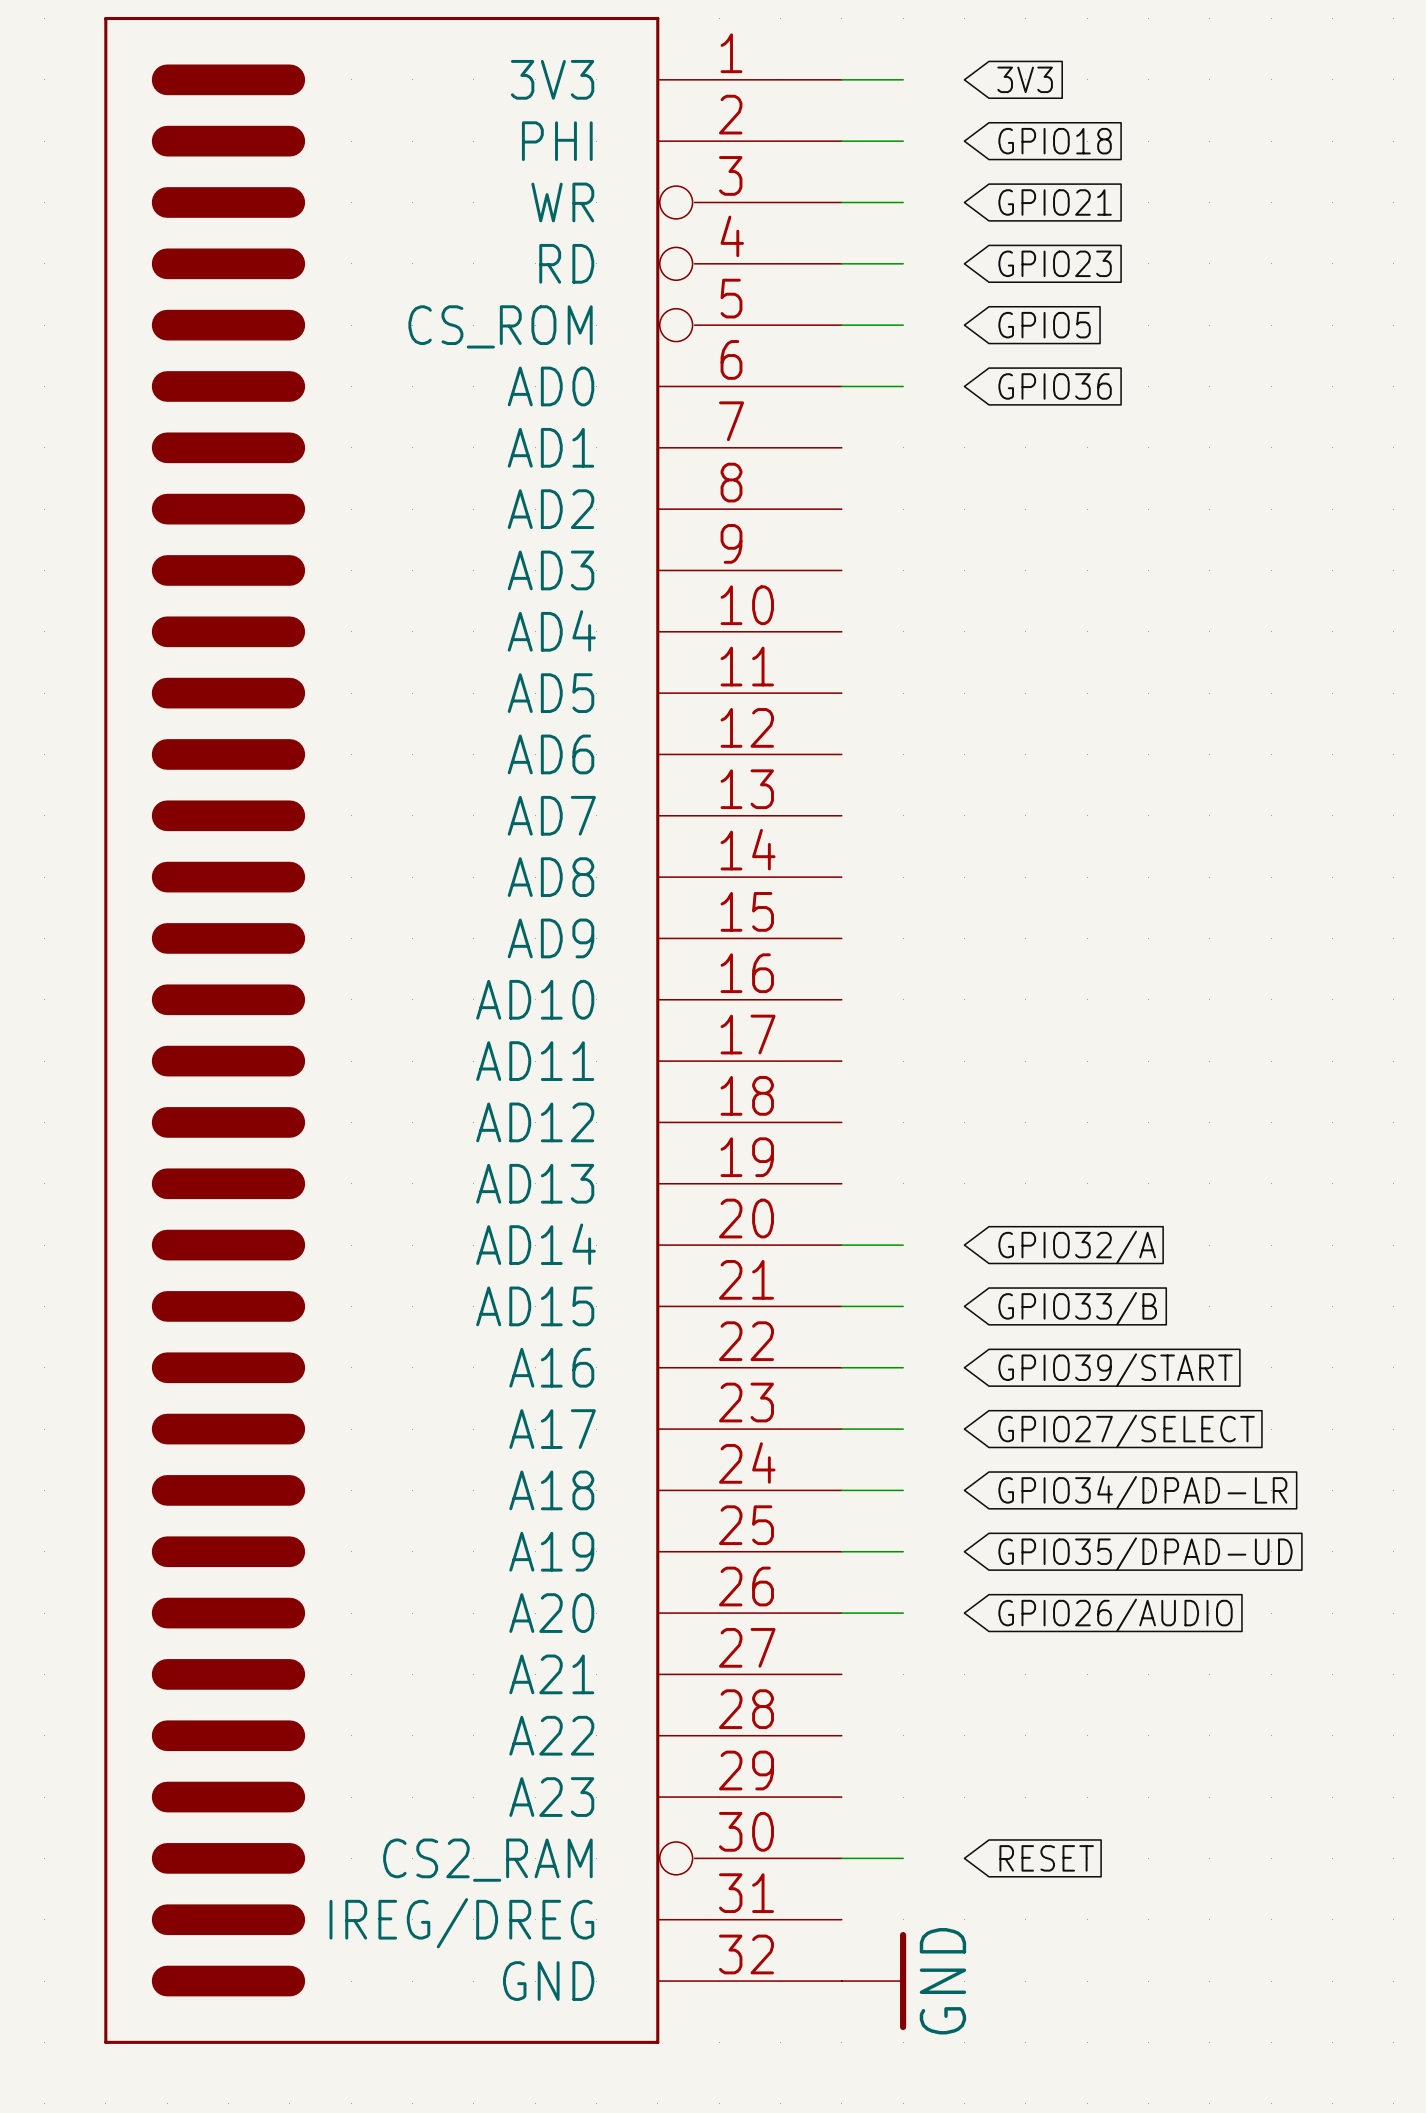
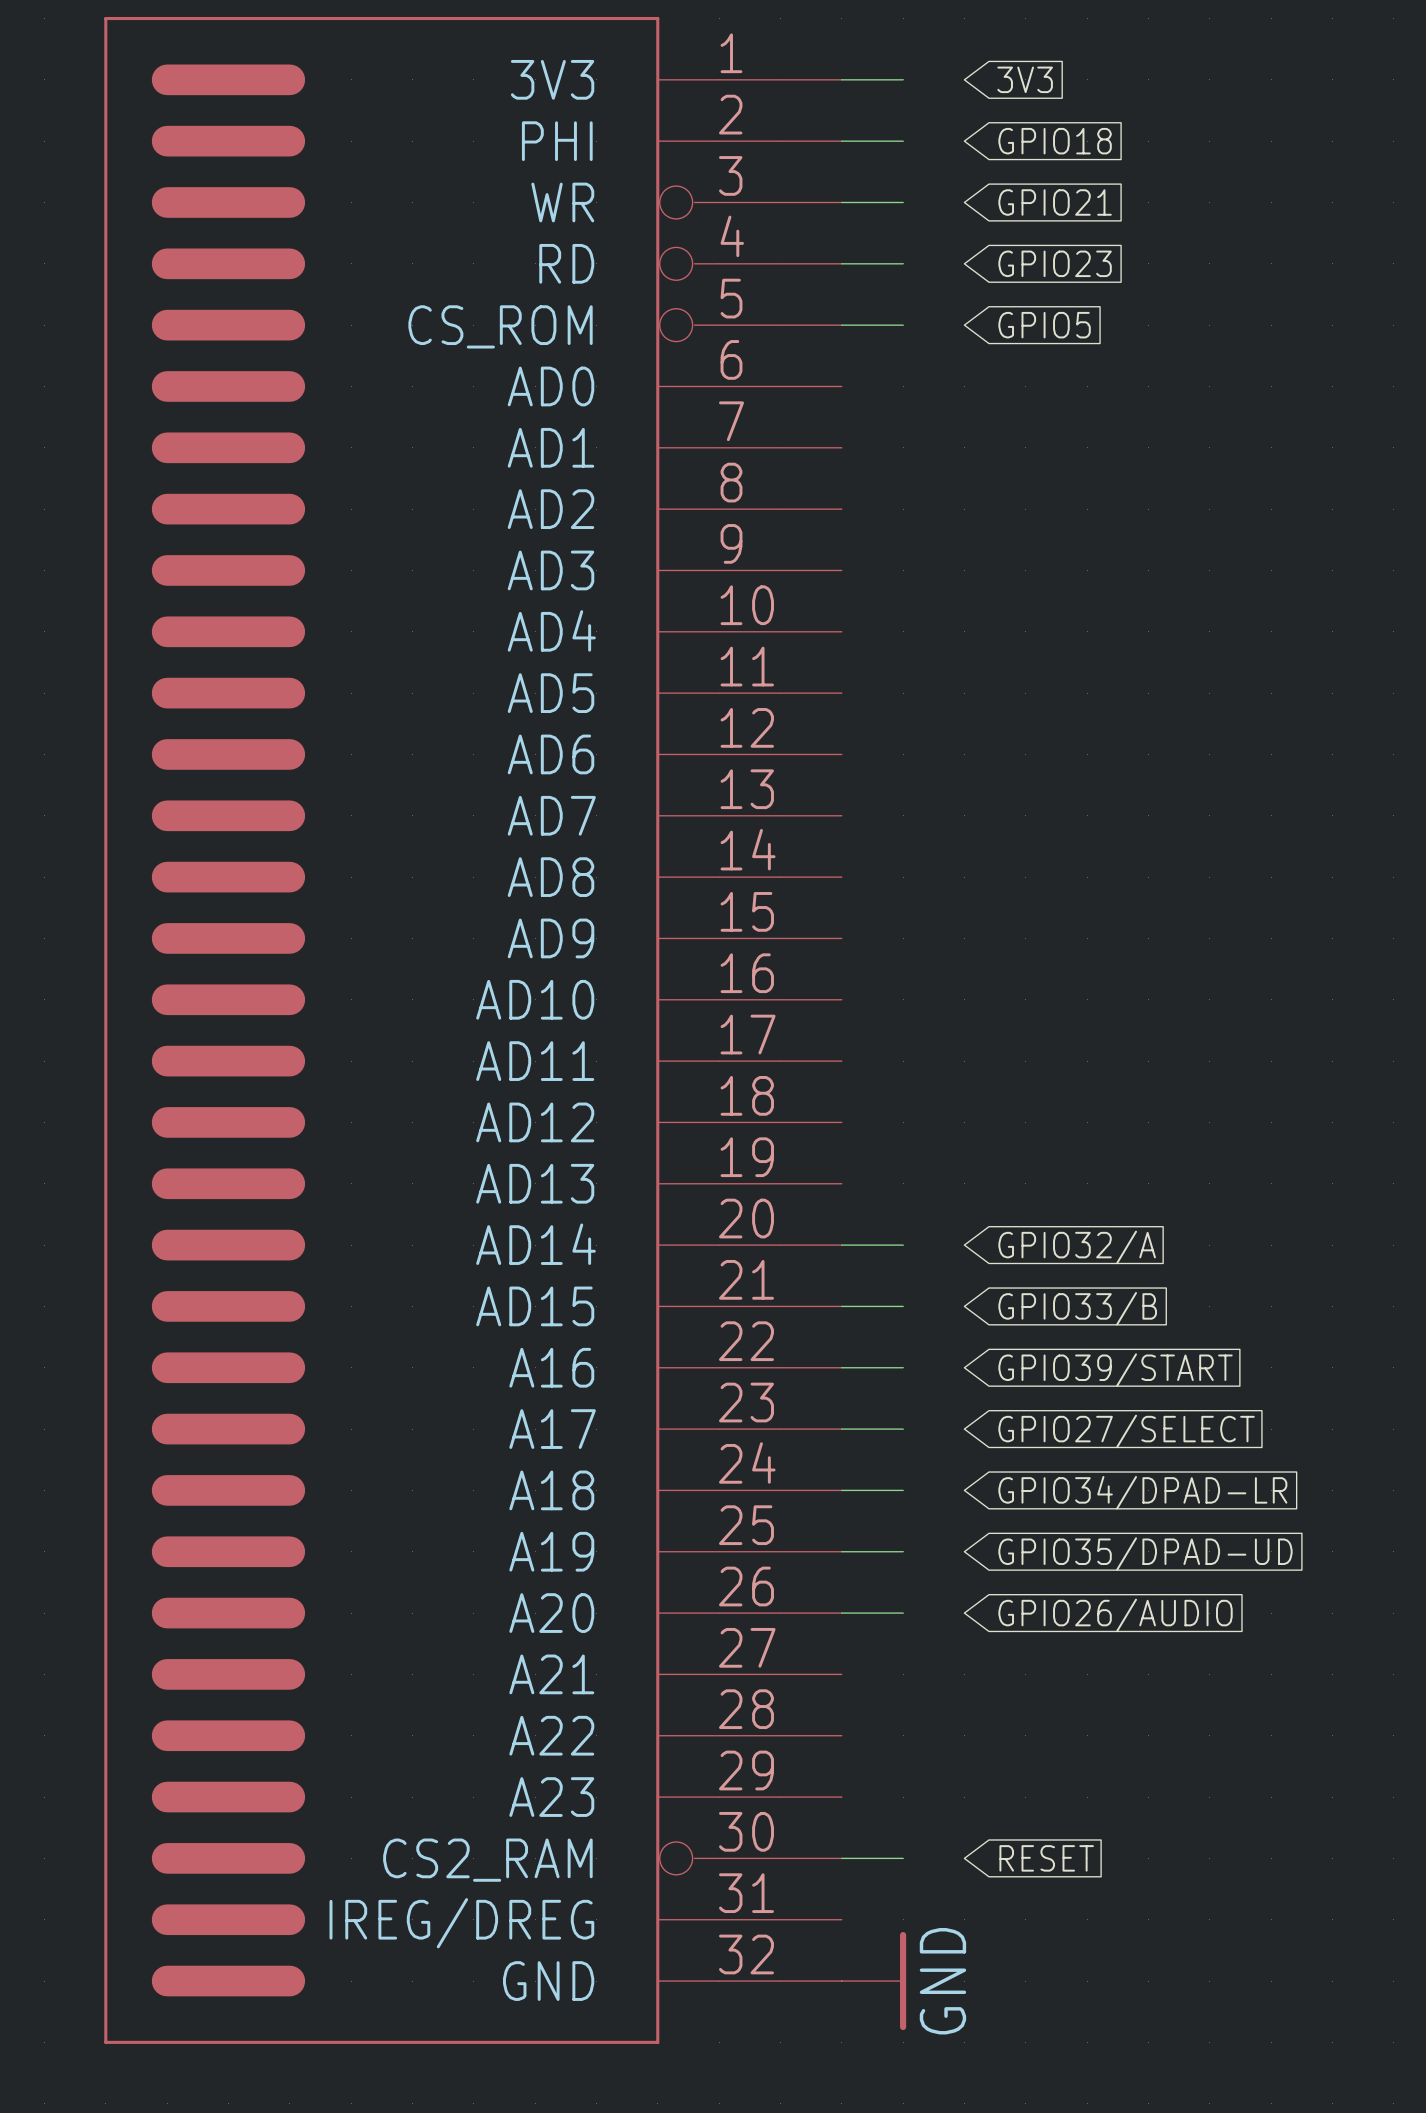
wire: (841, 386) (903, 386) -> none
global label: GPIO36 (1055, 386) -> none

